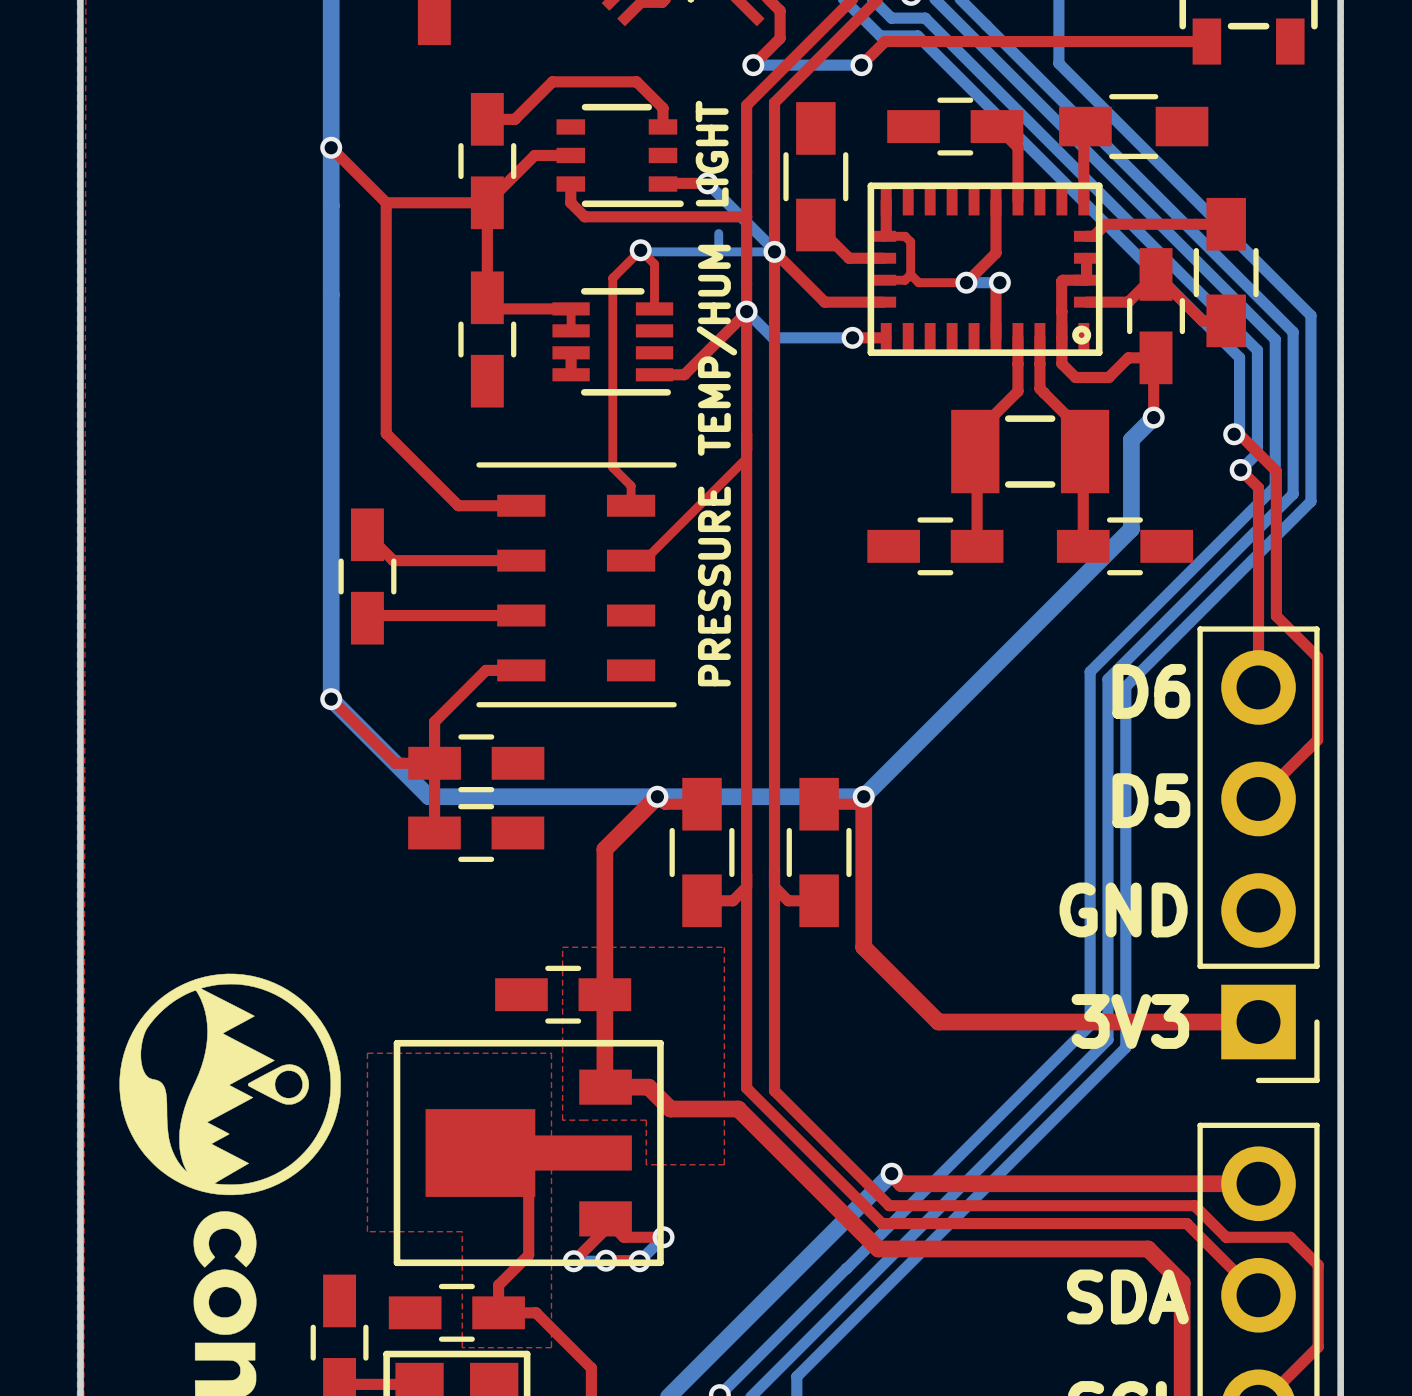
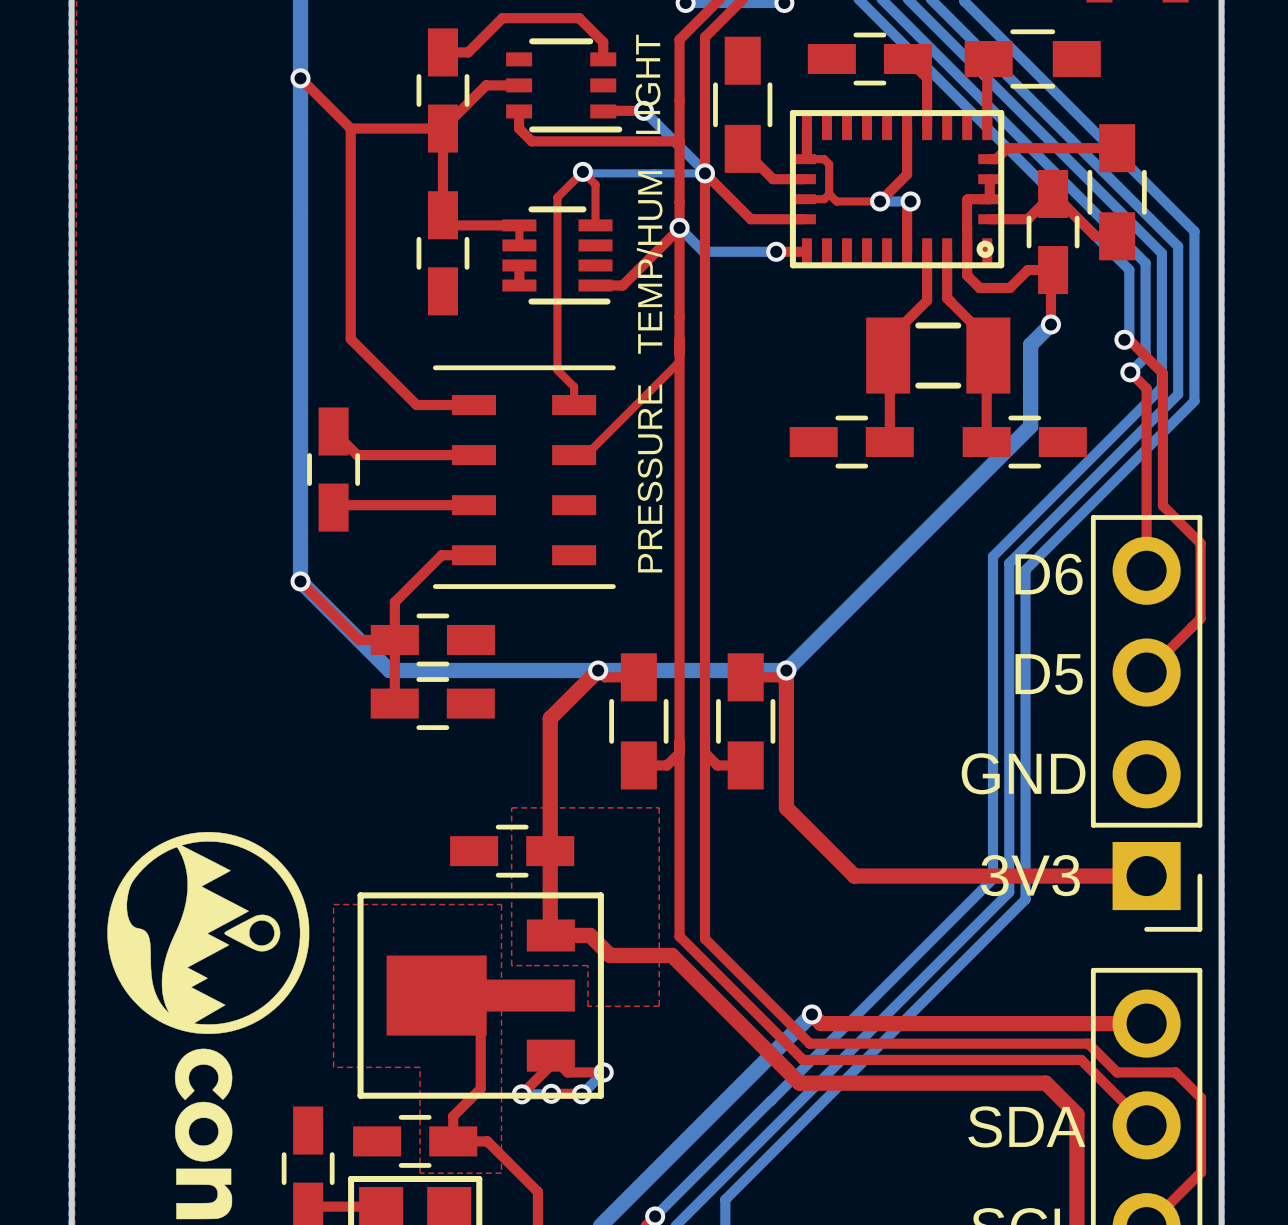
bottom track: (718, 233) (718, 251) -> none

